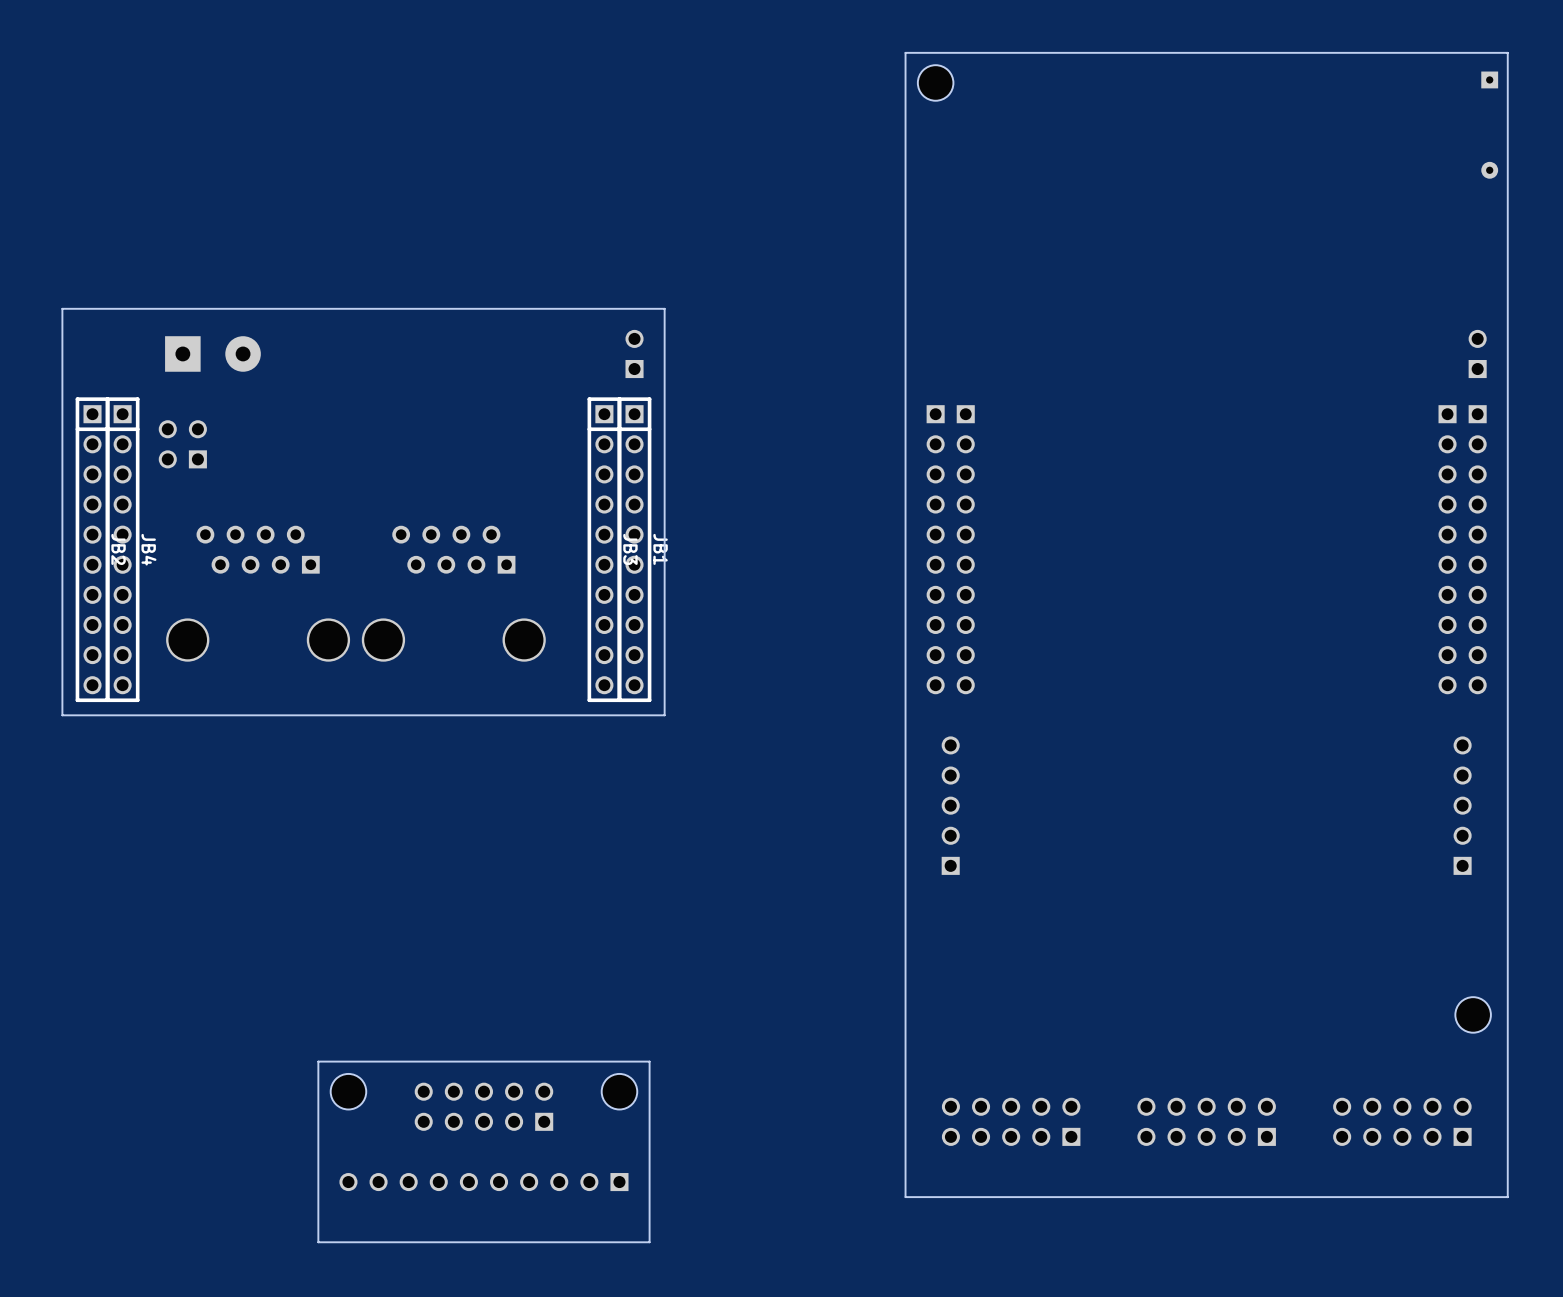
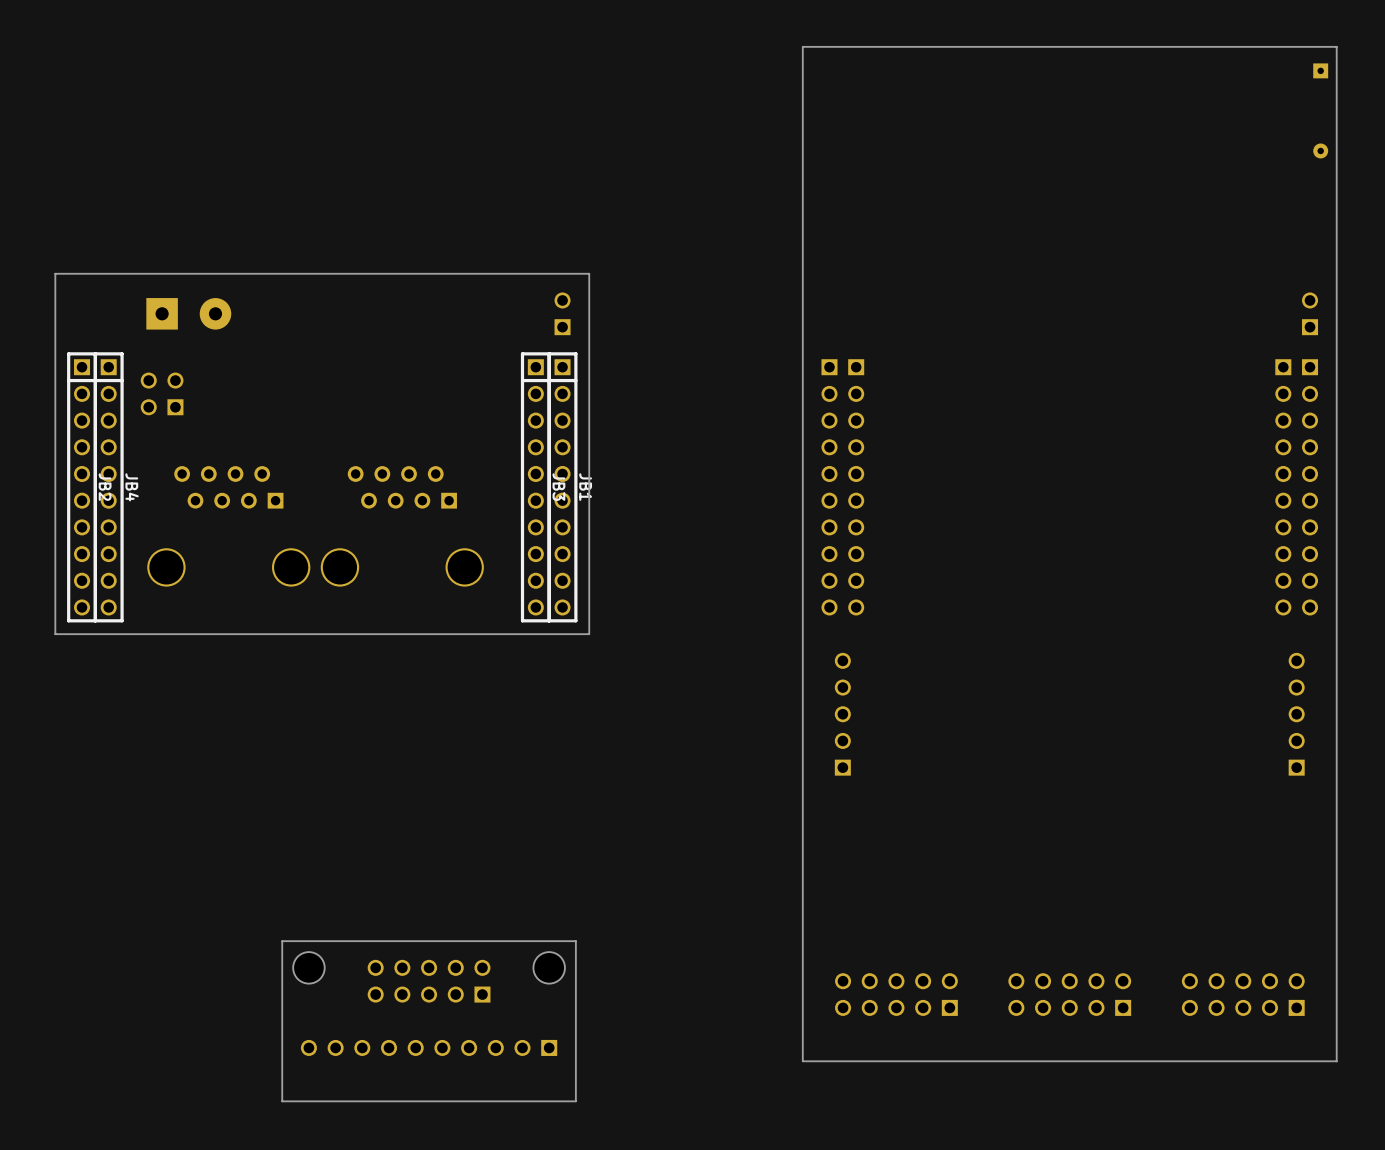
part: (935, 82) -> none
part: (1473, 1014) -> none

